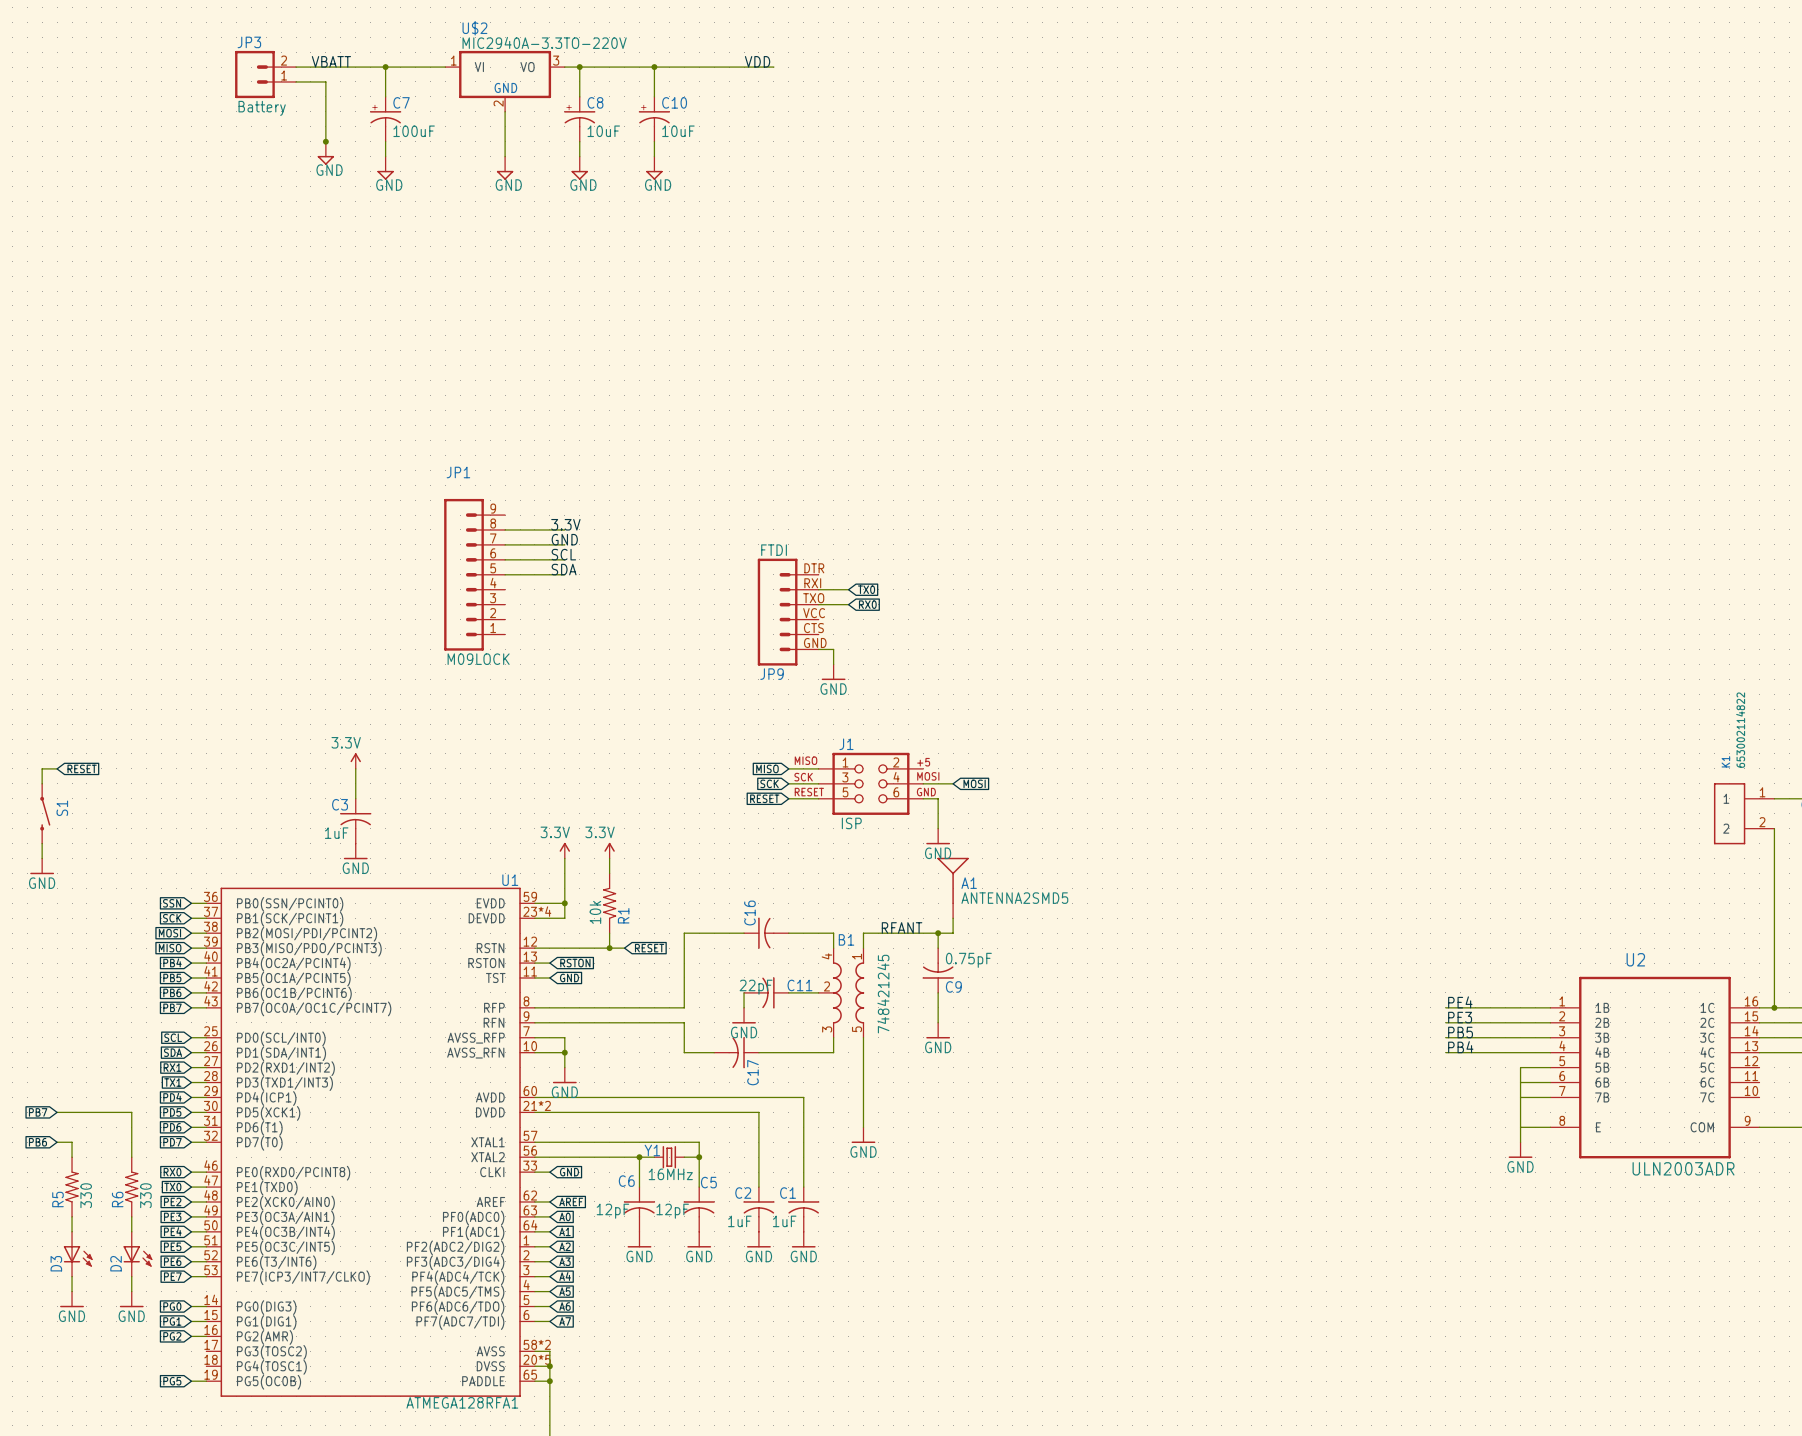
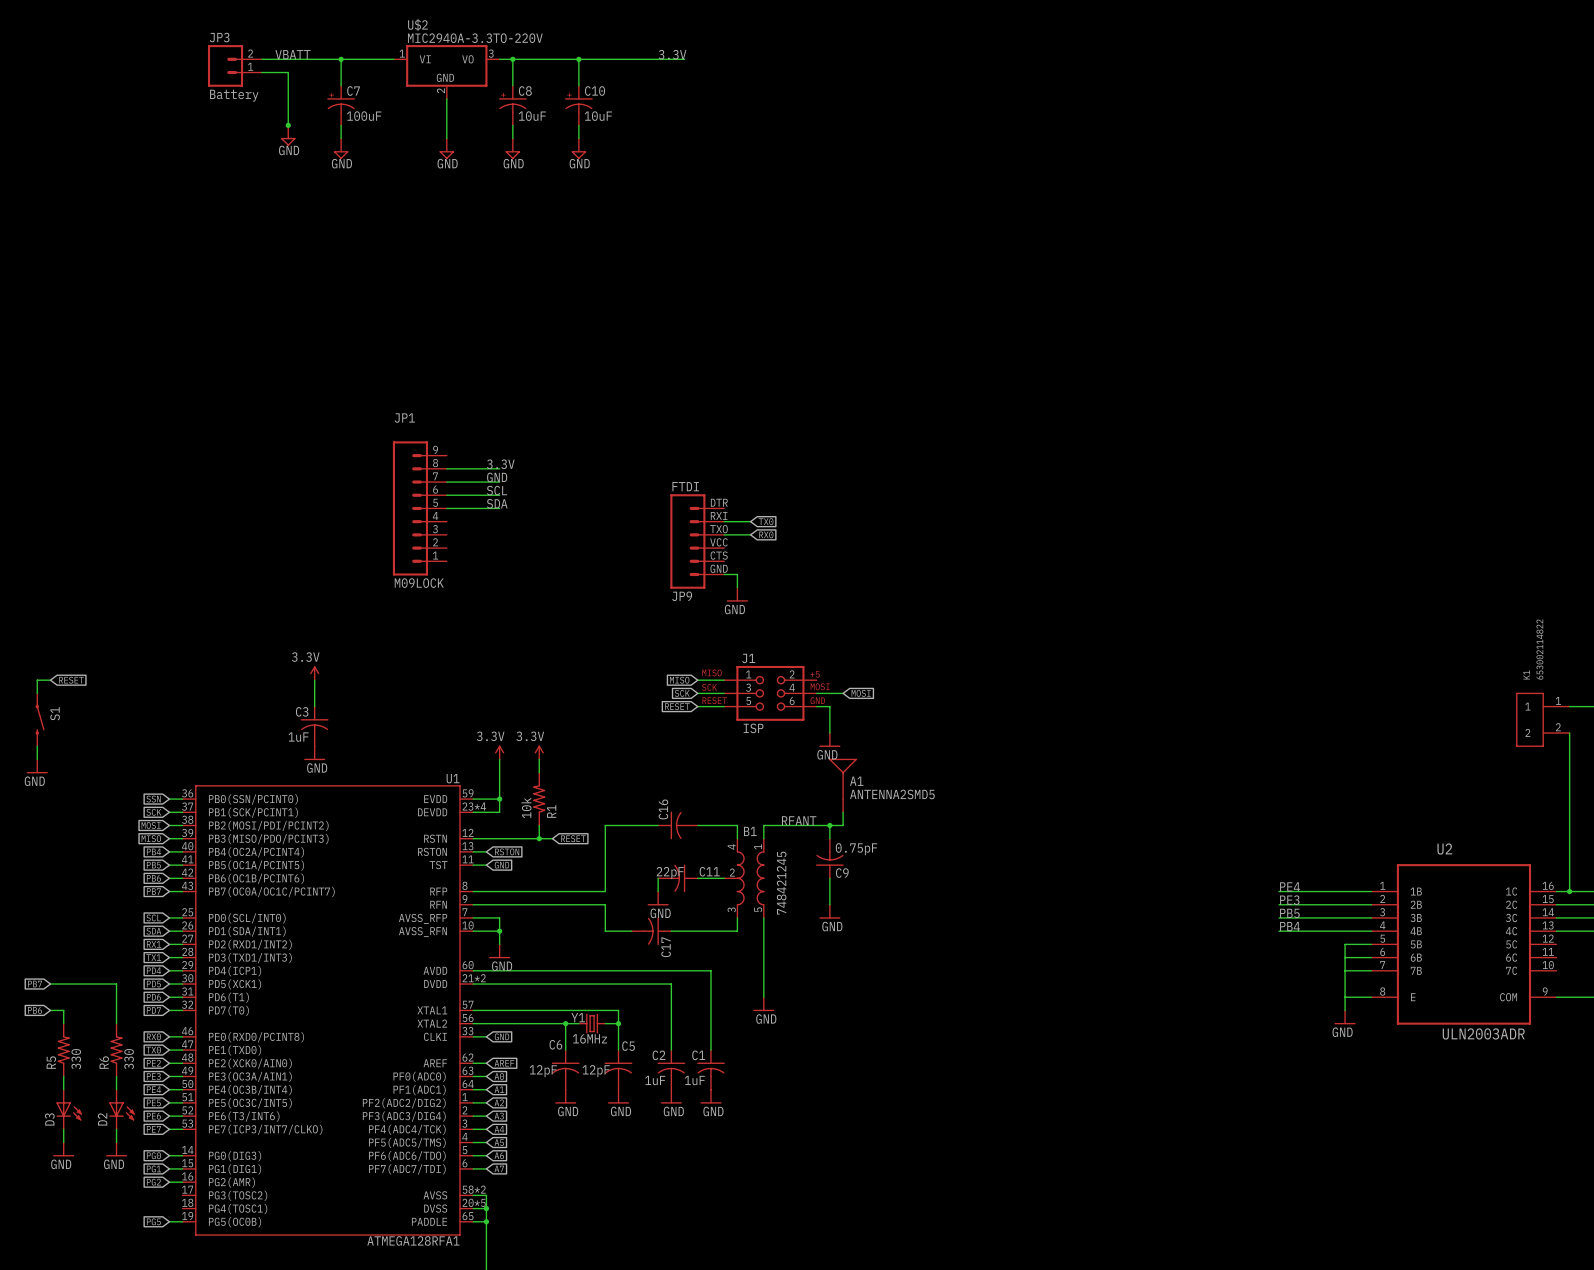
label: VDD (757, 61) -> 3.3V (672, 54)

